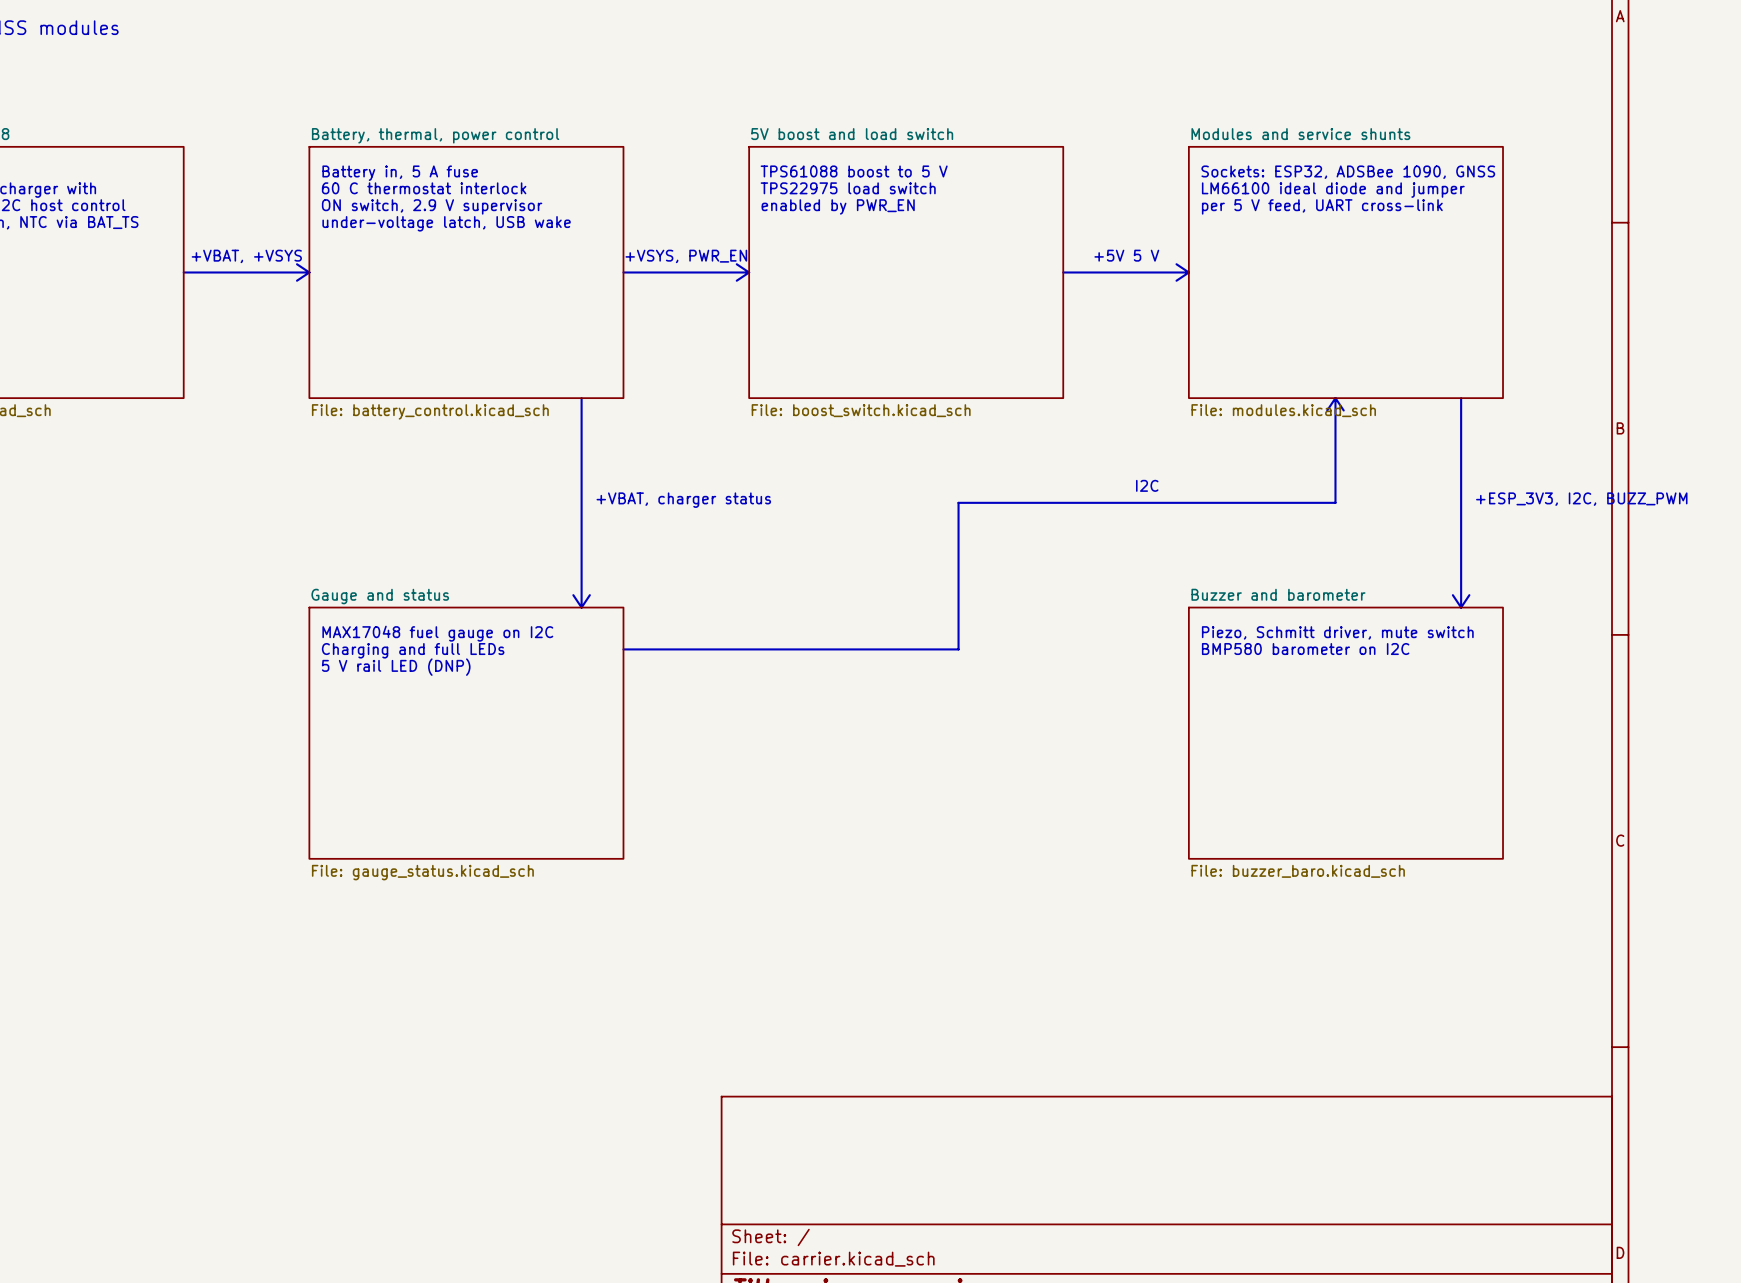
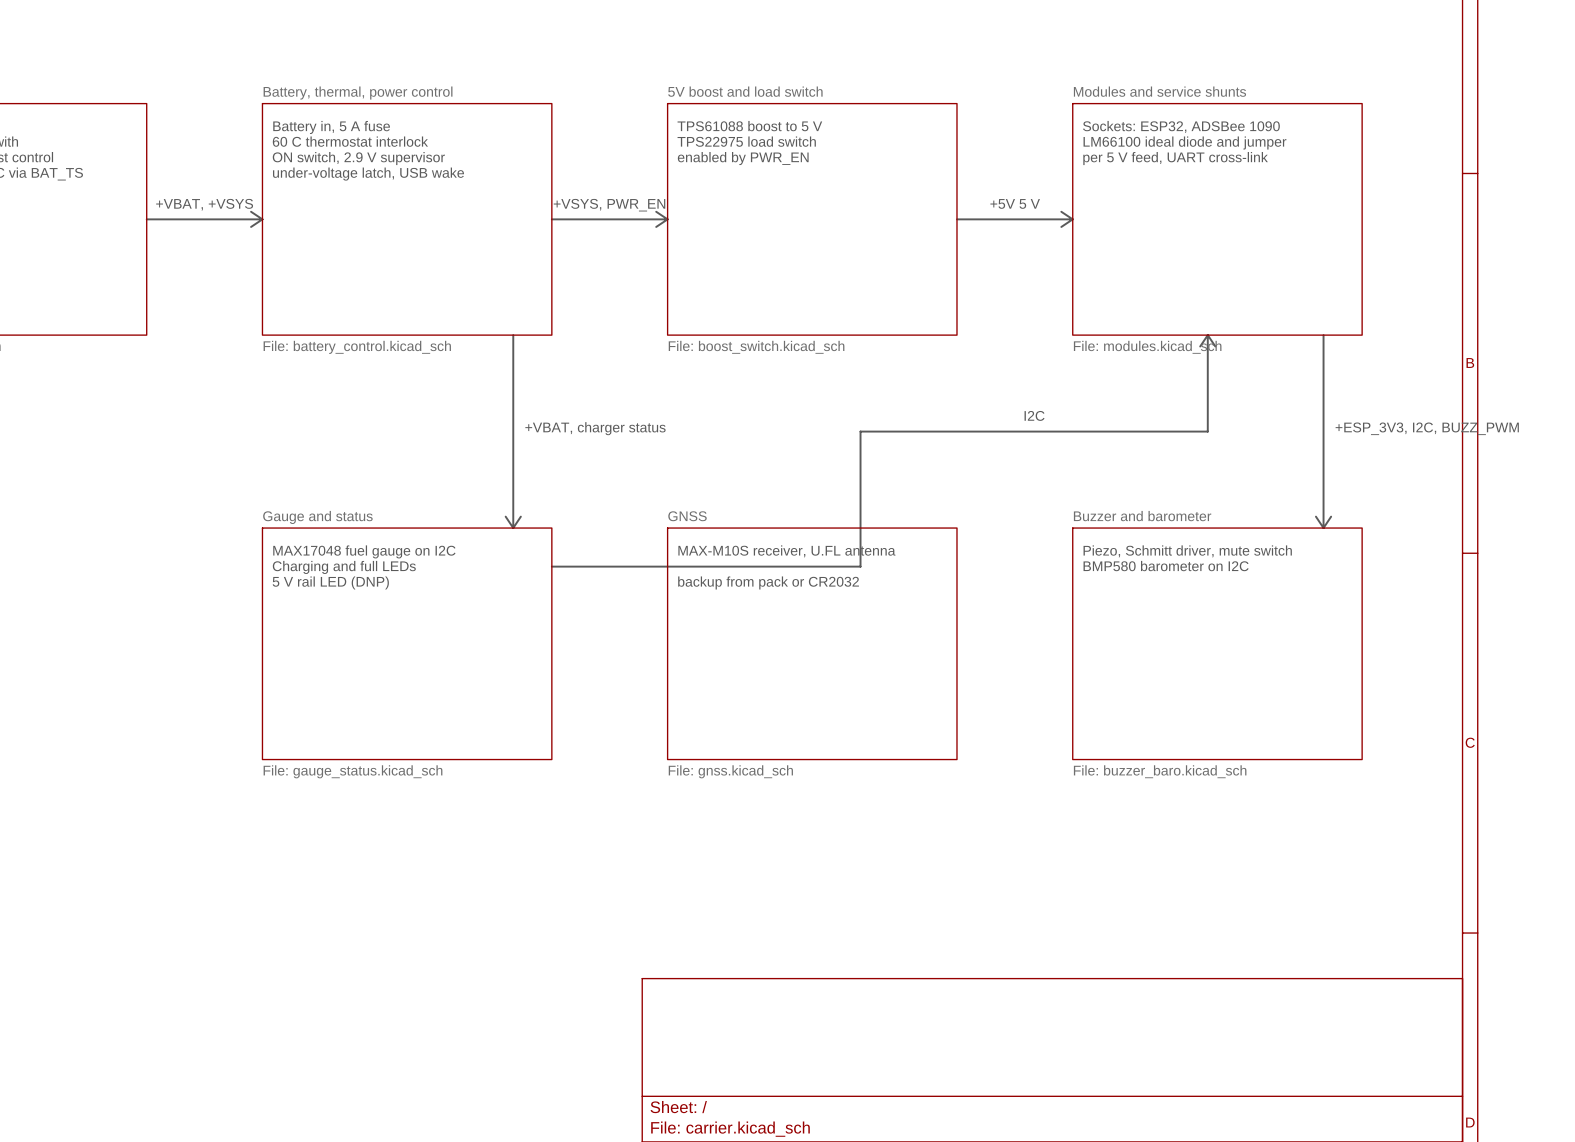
text: Sockets: ESP32, ADSBee 1090, GNSS (1348, 172) -> Sockets: ESP32, ADSBee 1090 (1181, 126)
text: none -> MAX-M10S receiver, U.FL antenna (786, 551)
text: none -> backup from pack or CR2032 (768, 582)
sheet GNSS: none -> File: gnss.kicad_sch (812, 643)

